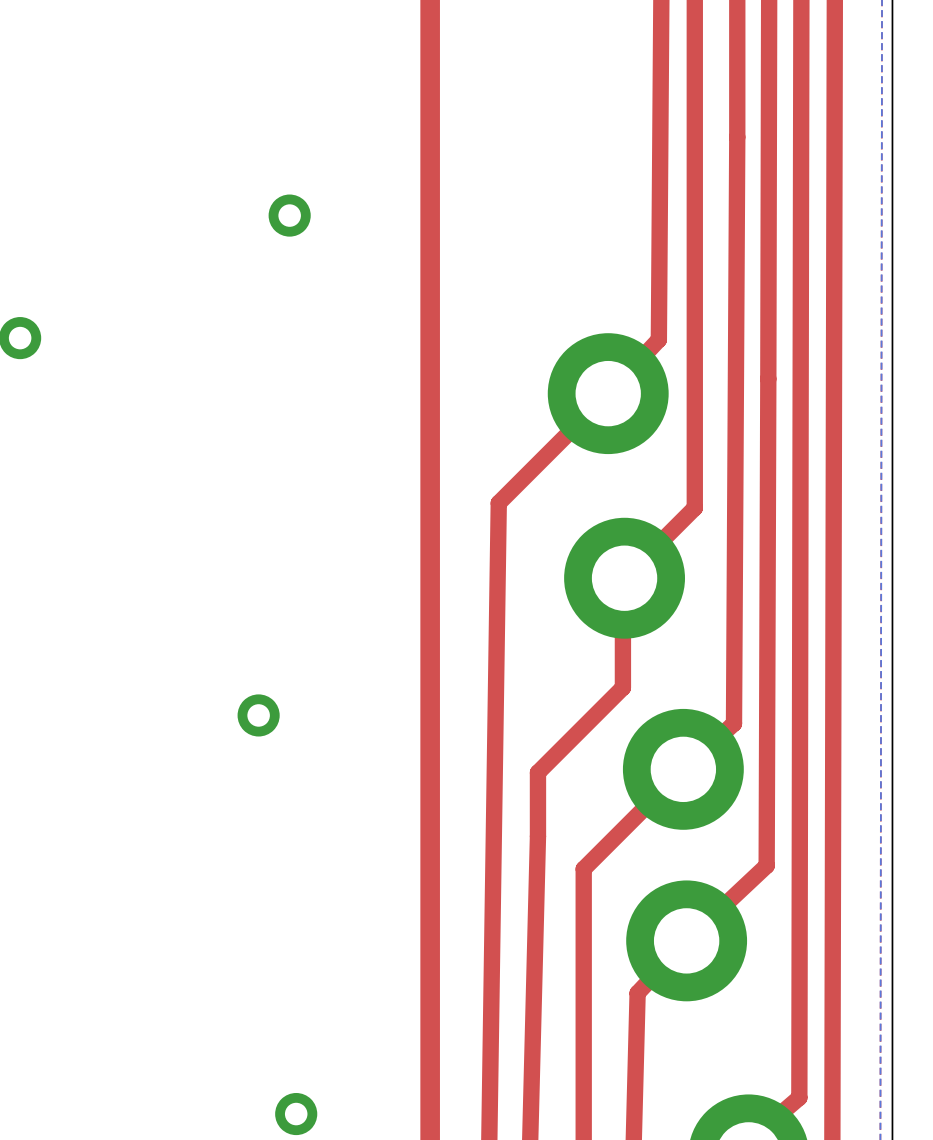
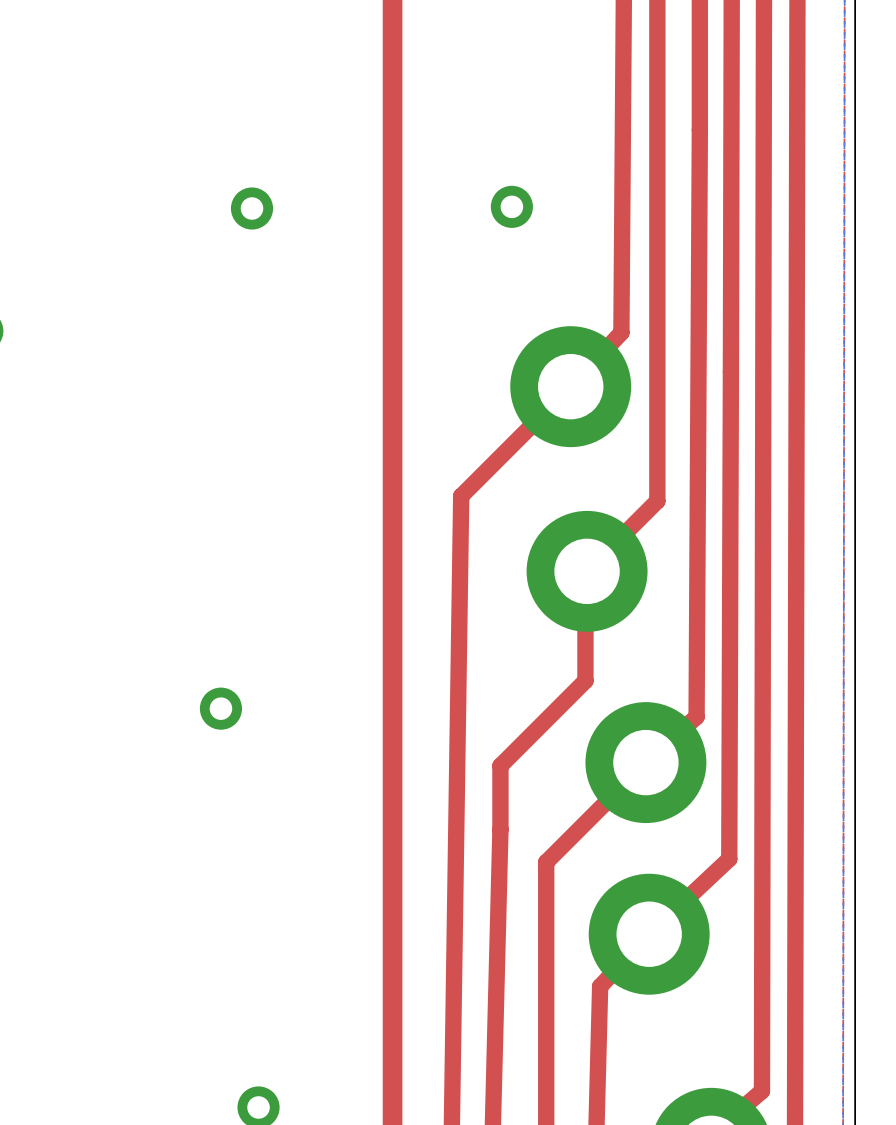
via: none -> (511, 206)

